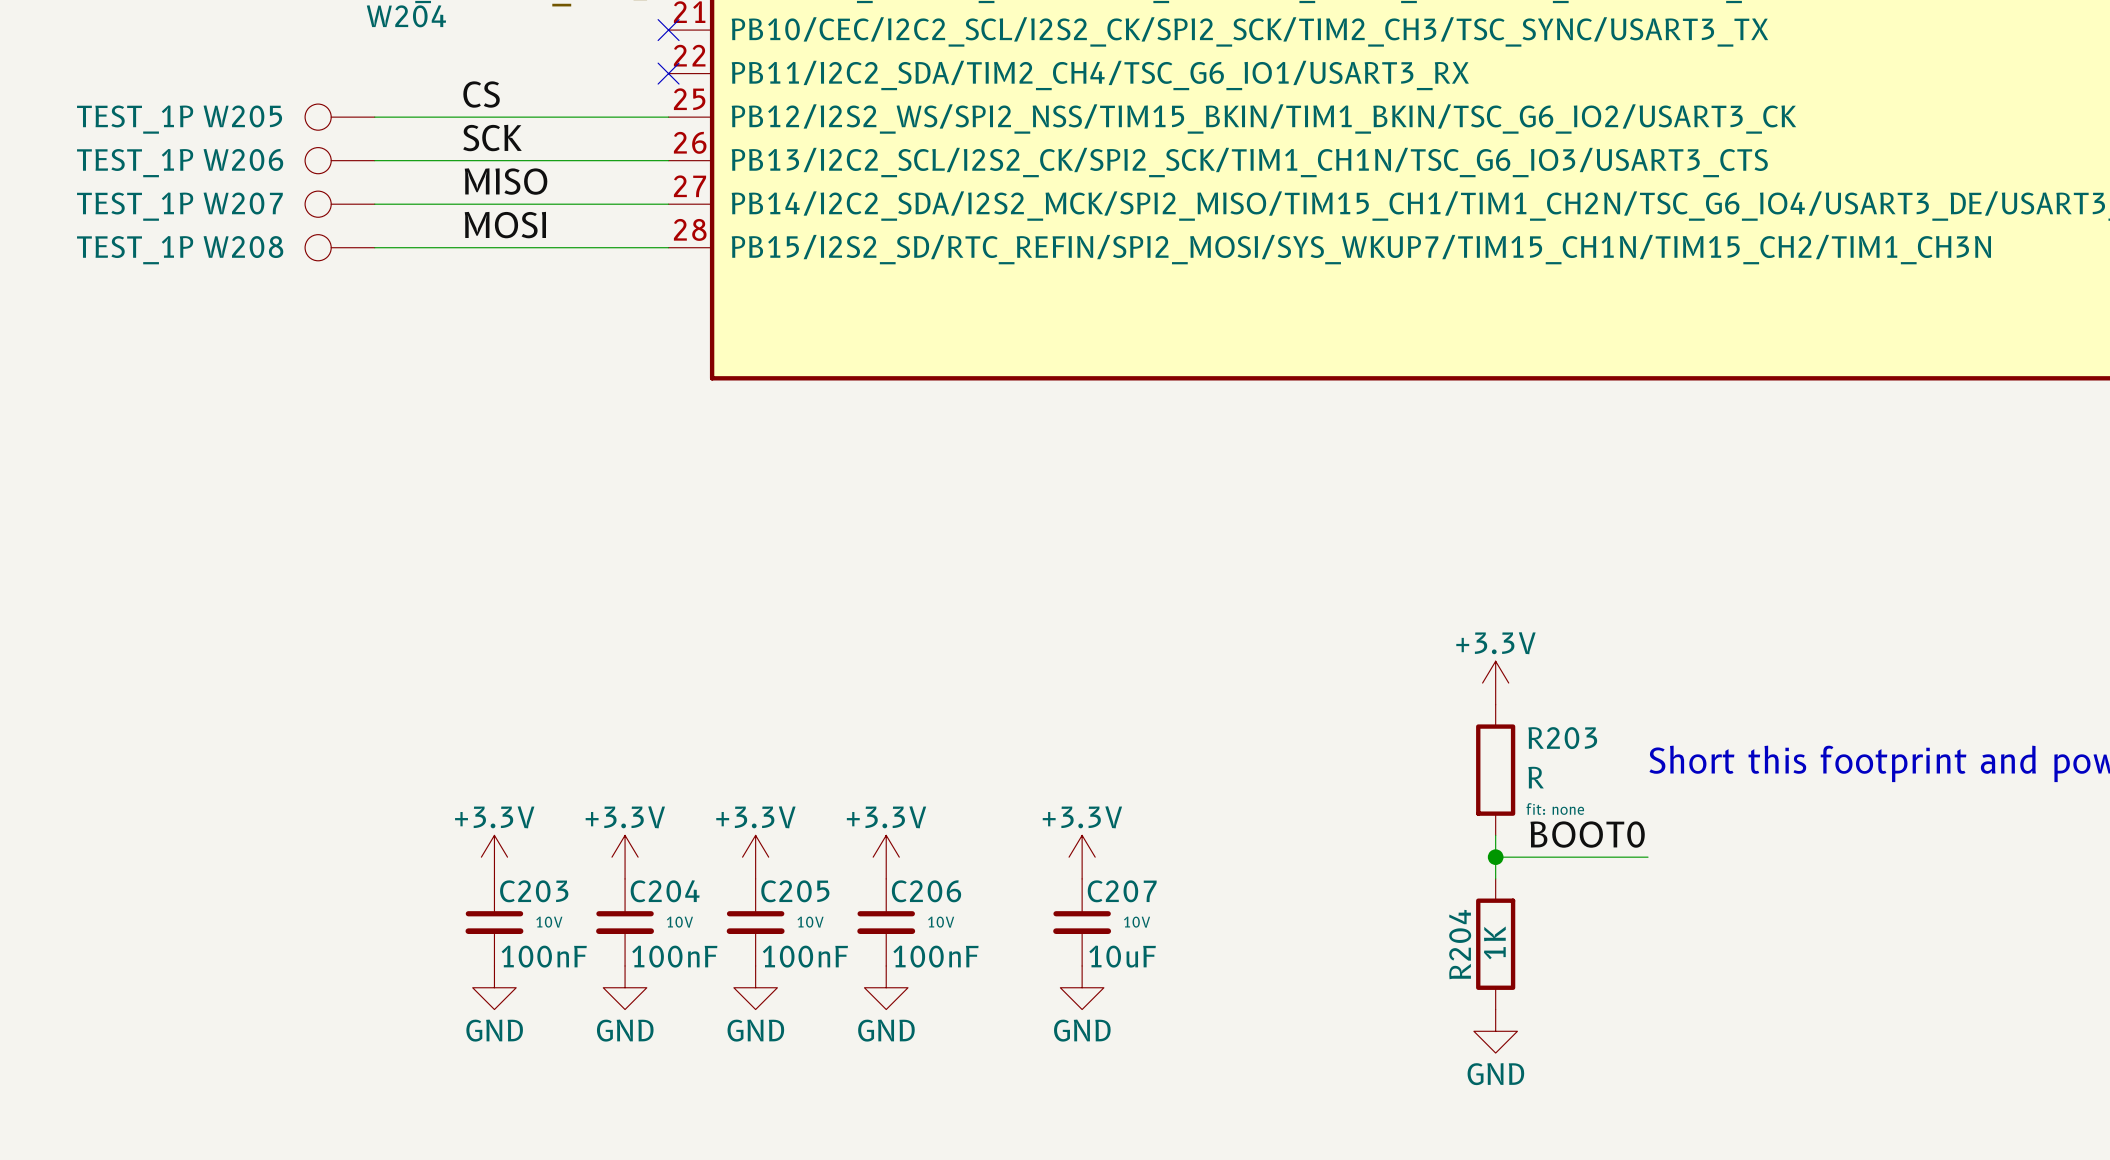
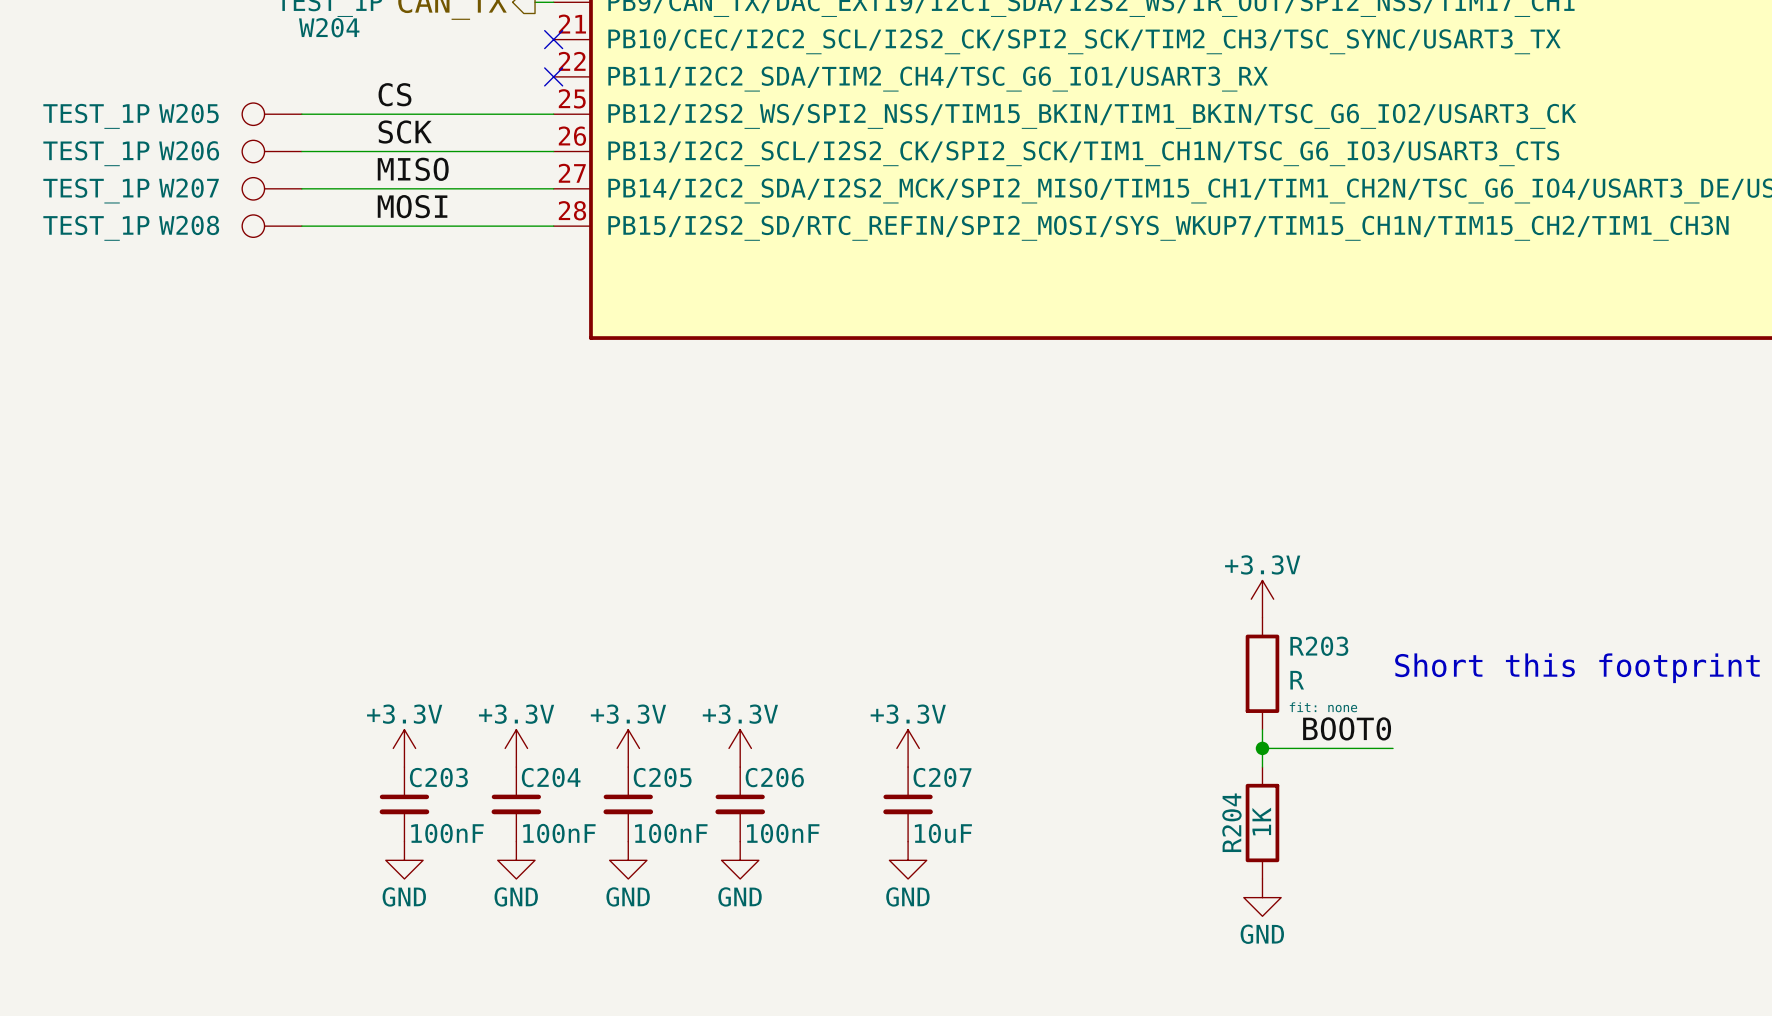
C203 text: 10V (549, 922) -> none
C204 text: 10V (679, 922) -> none
C205 text: 10V (810, 922) -> none
C206 text: 10V (941, 922) -> none
C207 text: 10V (1137, 922) -> none

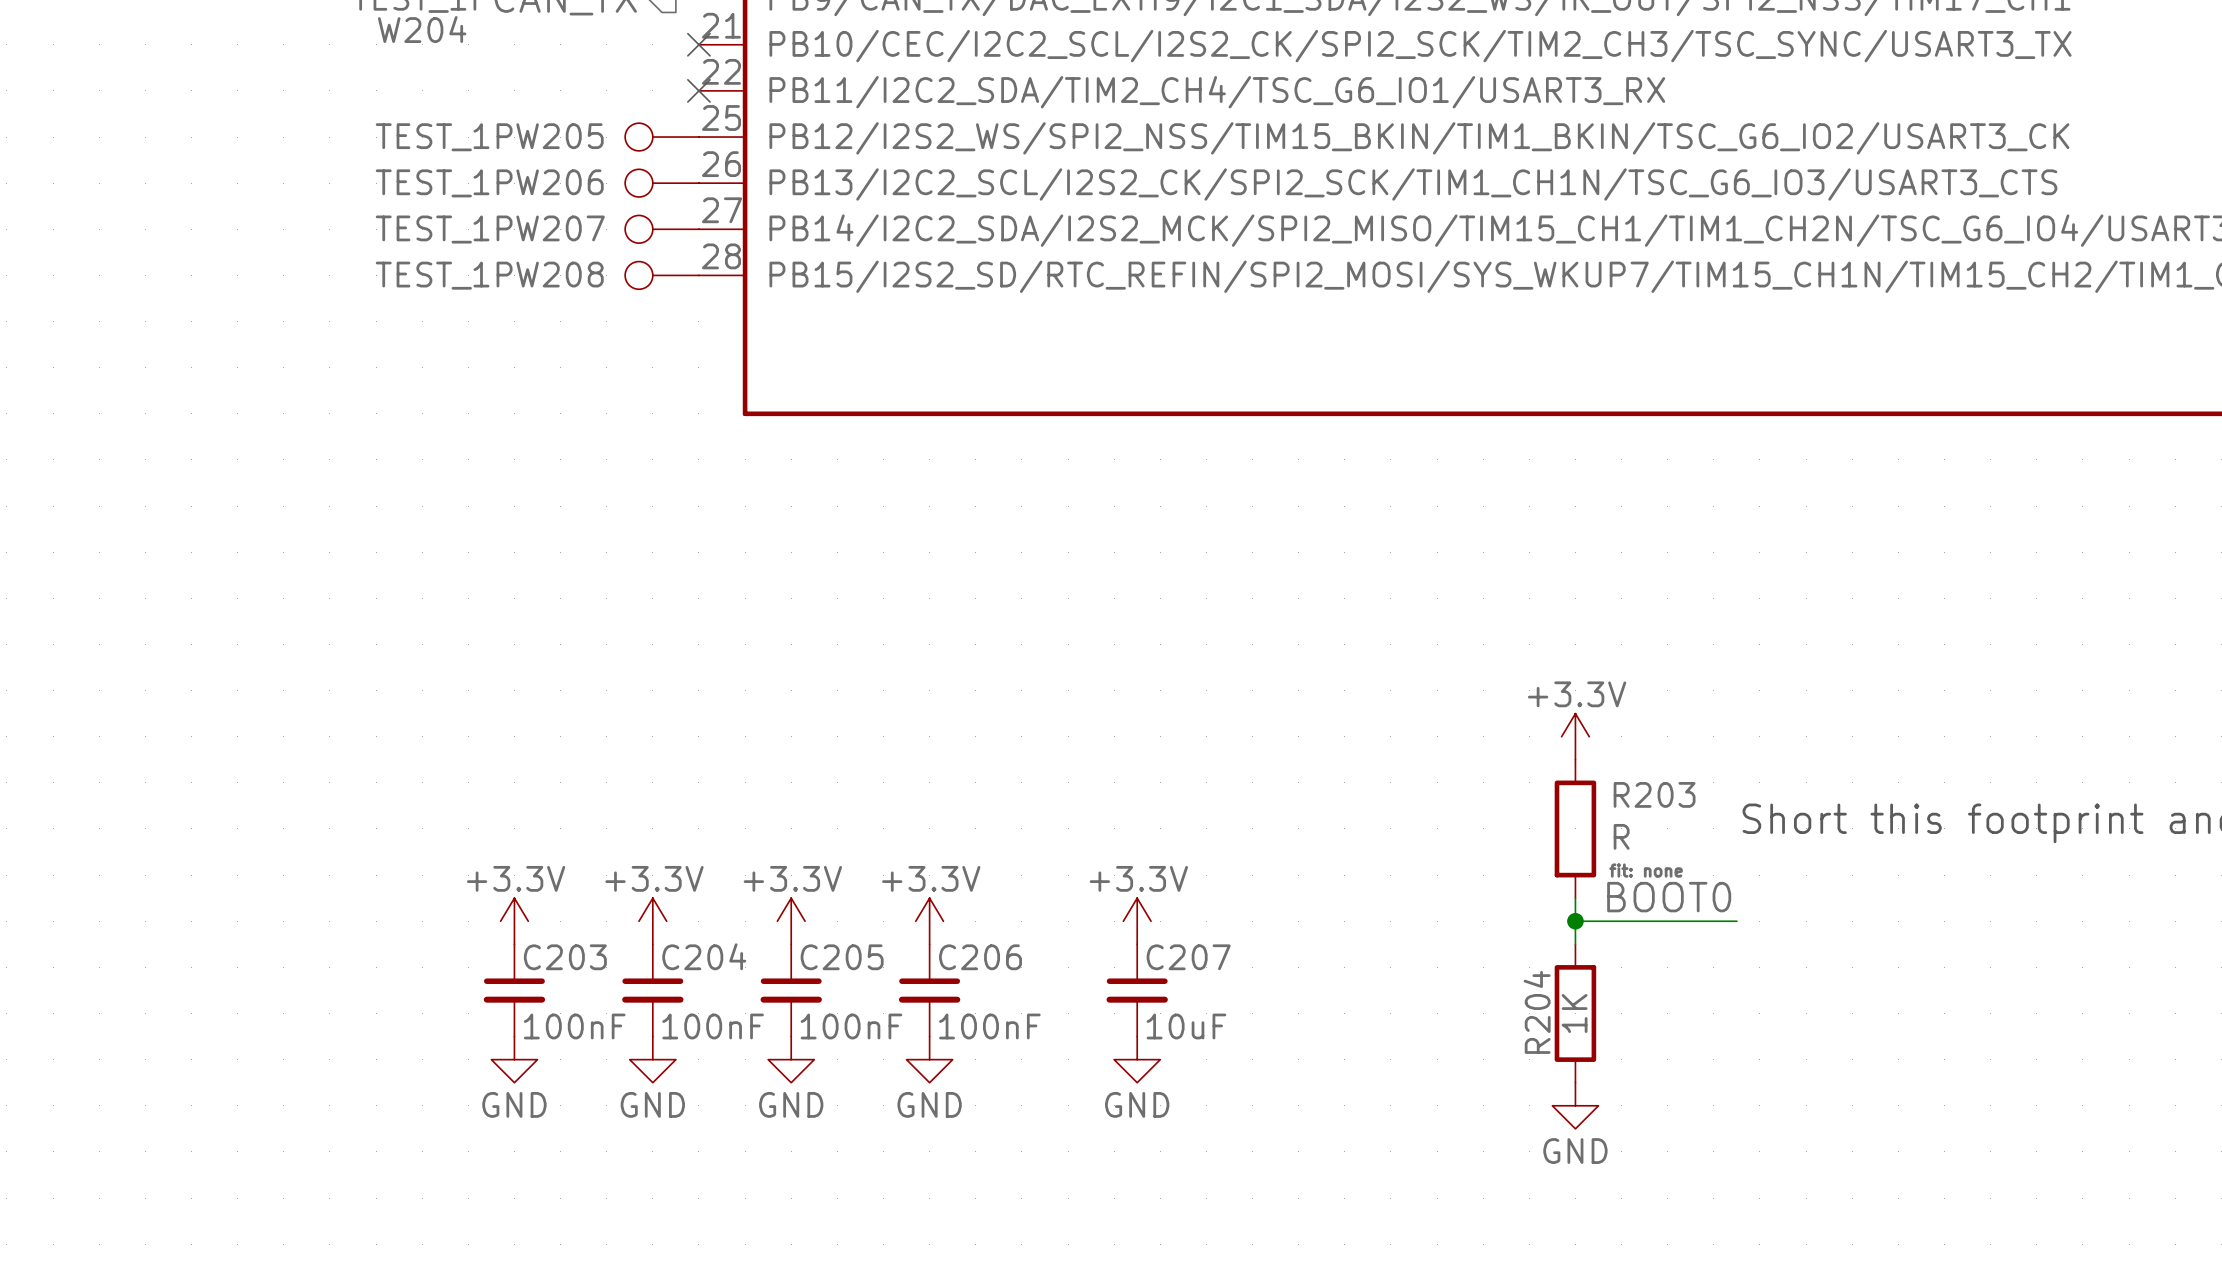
label: CS (394, 94) -> none
W205 position: (272, 114) -> (662, 137)
wire: (301, 114) (553, 114) -> none
label: SCK (405, 132) -> none
W206 position: (272, 151) -> (662, 183)
wire: (301, 151) (553, 151) -> none
label: MISO (413, 169) -> none
W207 position: (272, 188) -> (662, 229)
wire: (301, 188) (553, 188) -> none
label: MOSI (412, 206) -> none
W208 position: (272, 226) -> (662, 275)
wire: (301, 226) (553, 226) -> none

